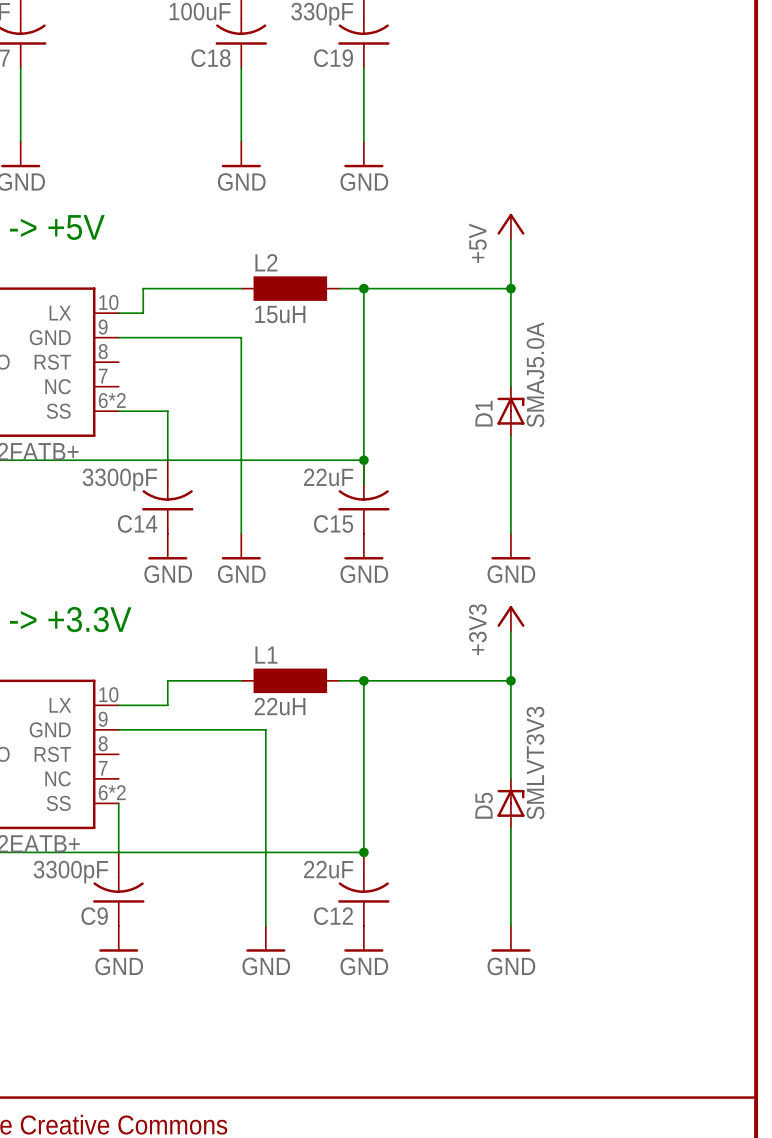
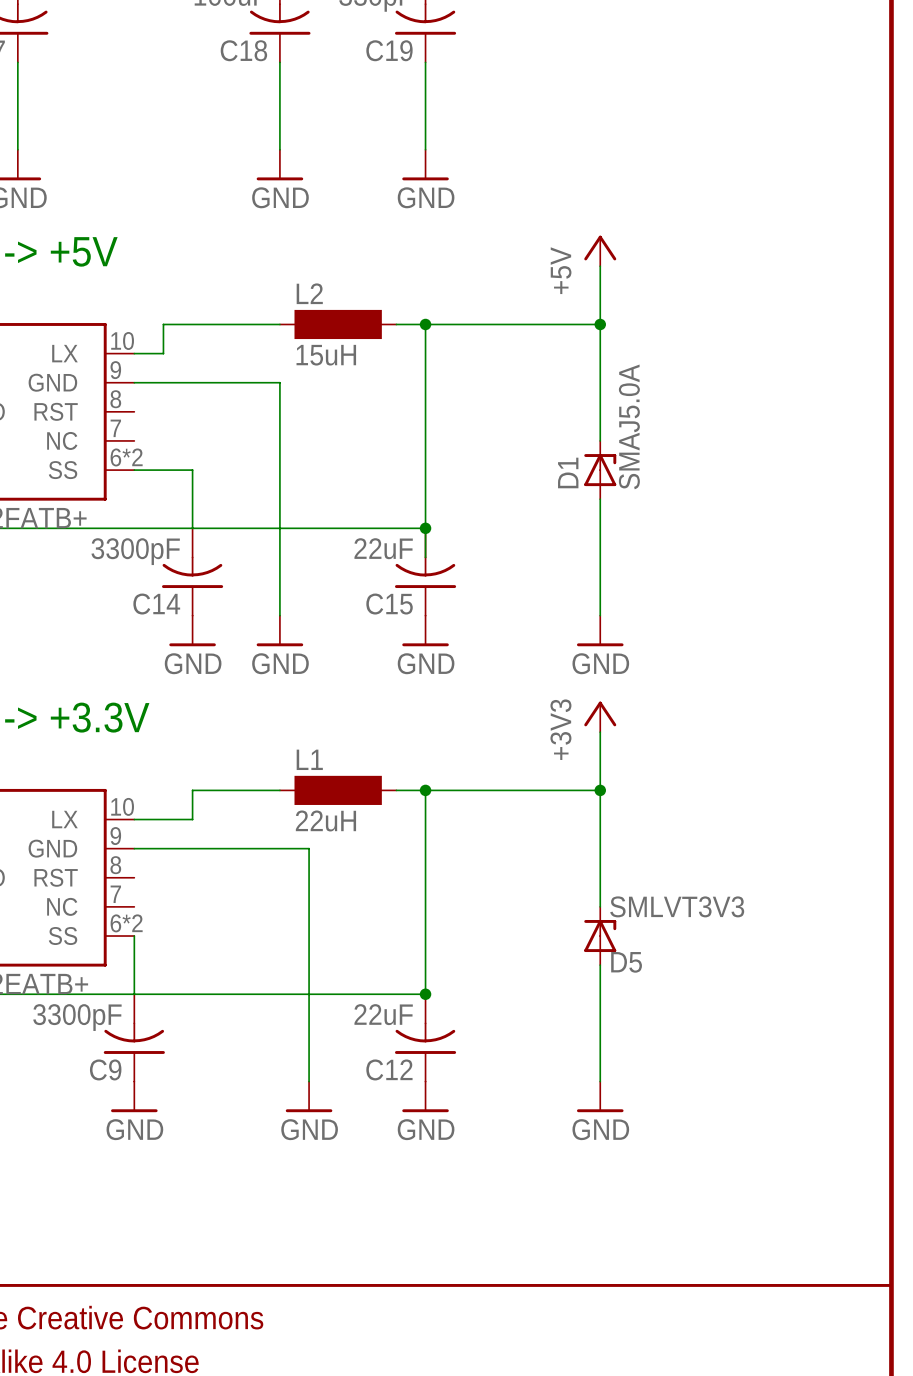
D5 value rotation: 0° (535, 763) -> 90° clockwise (677, 906)
D5 name rotation: 0° (484, 805) -> 90° clockwise (626, 962)
D5 name position: D5 (484, 805) -> D5 (626, 962)

